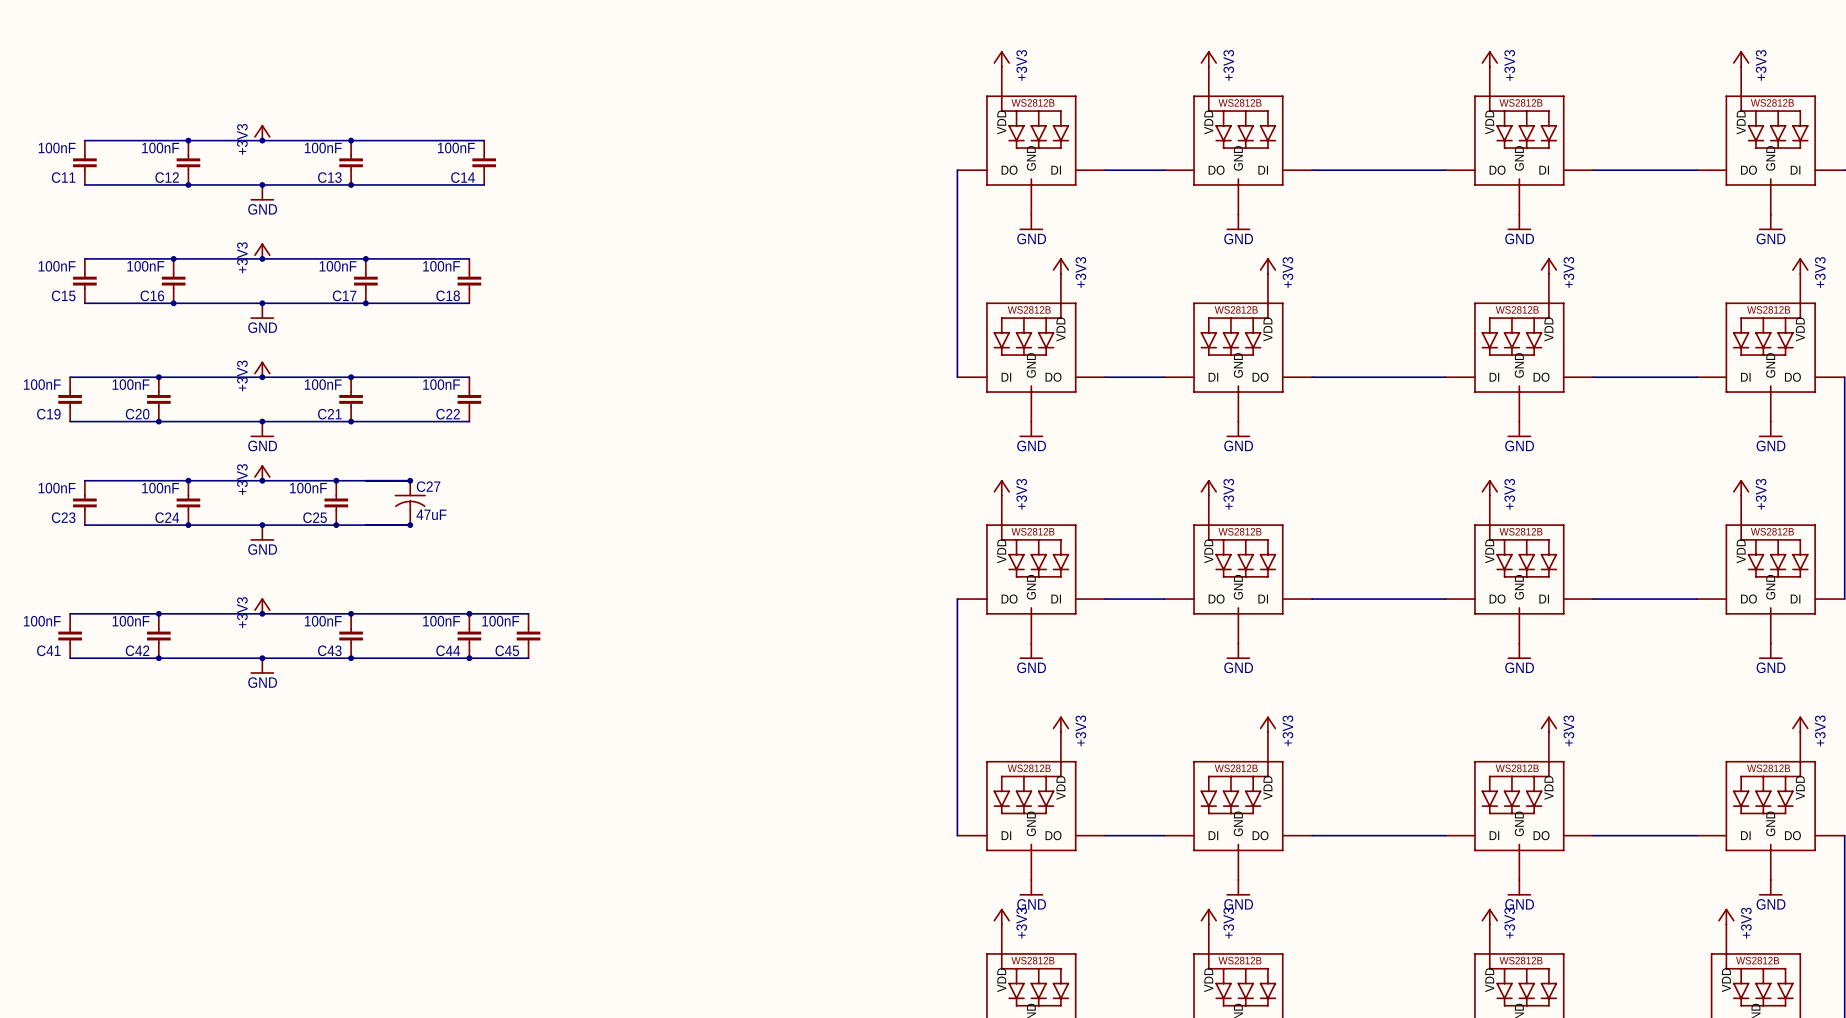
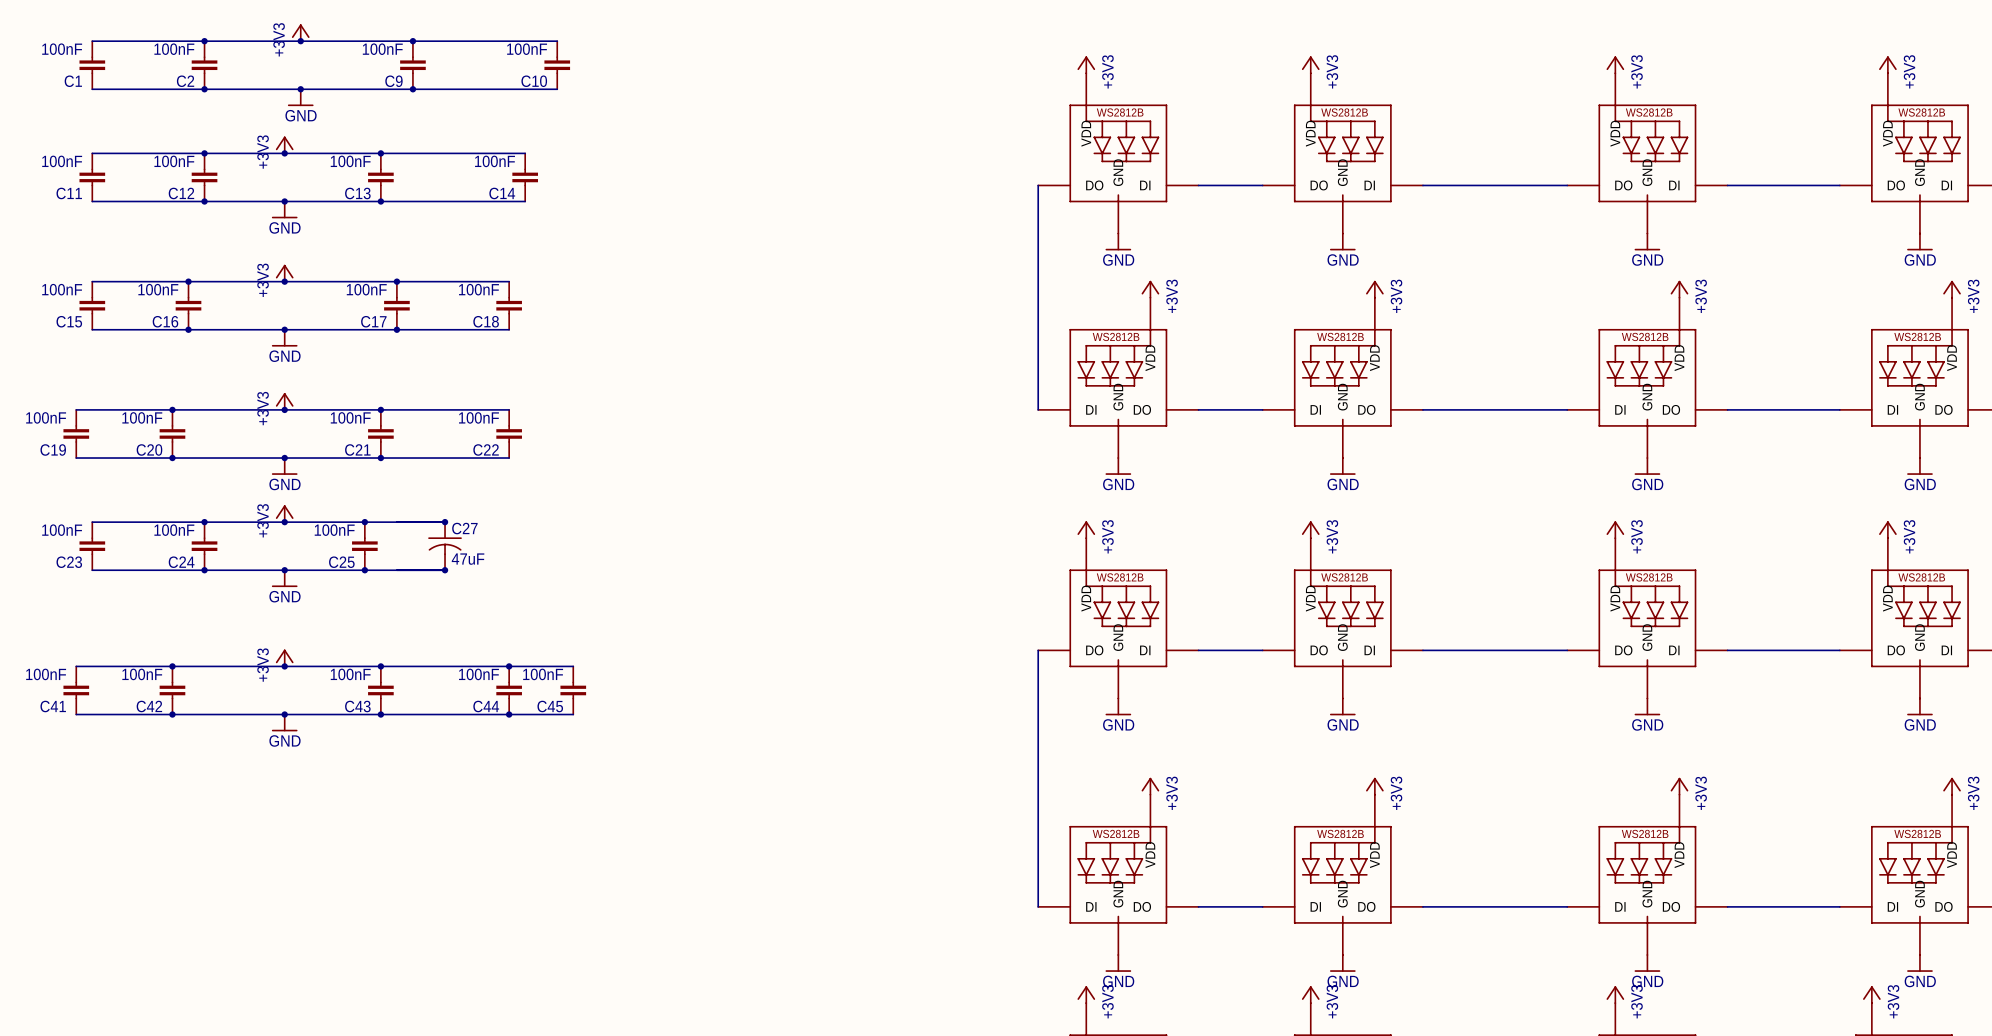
power symbol: none -> +3V3 (300, 32)
wire: none -> (92, 41) (557, 41)
junction: none -> (204, 41)
junction: none -> (300, 41)
junction: none -> (412, 41)
C1: none -> 100nF (92, 65)
C2: none -> 100nF (204, 65)
C9: none -> 100nF (412, 65)
C10: none -> 100nF (557, 65)
wire: none -> (92, 89) (557, 89)
junction: none -> (204, 89)
junction: none -> (300, 89)
junction: none -> (412, 89)
power symbol: none -> GND (300, 97)

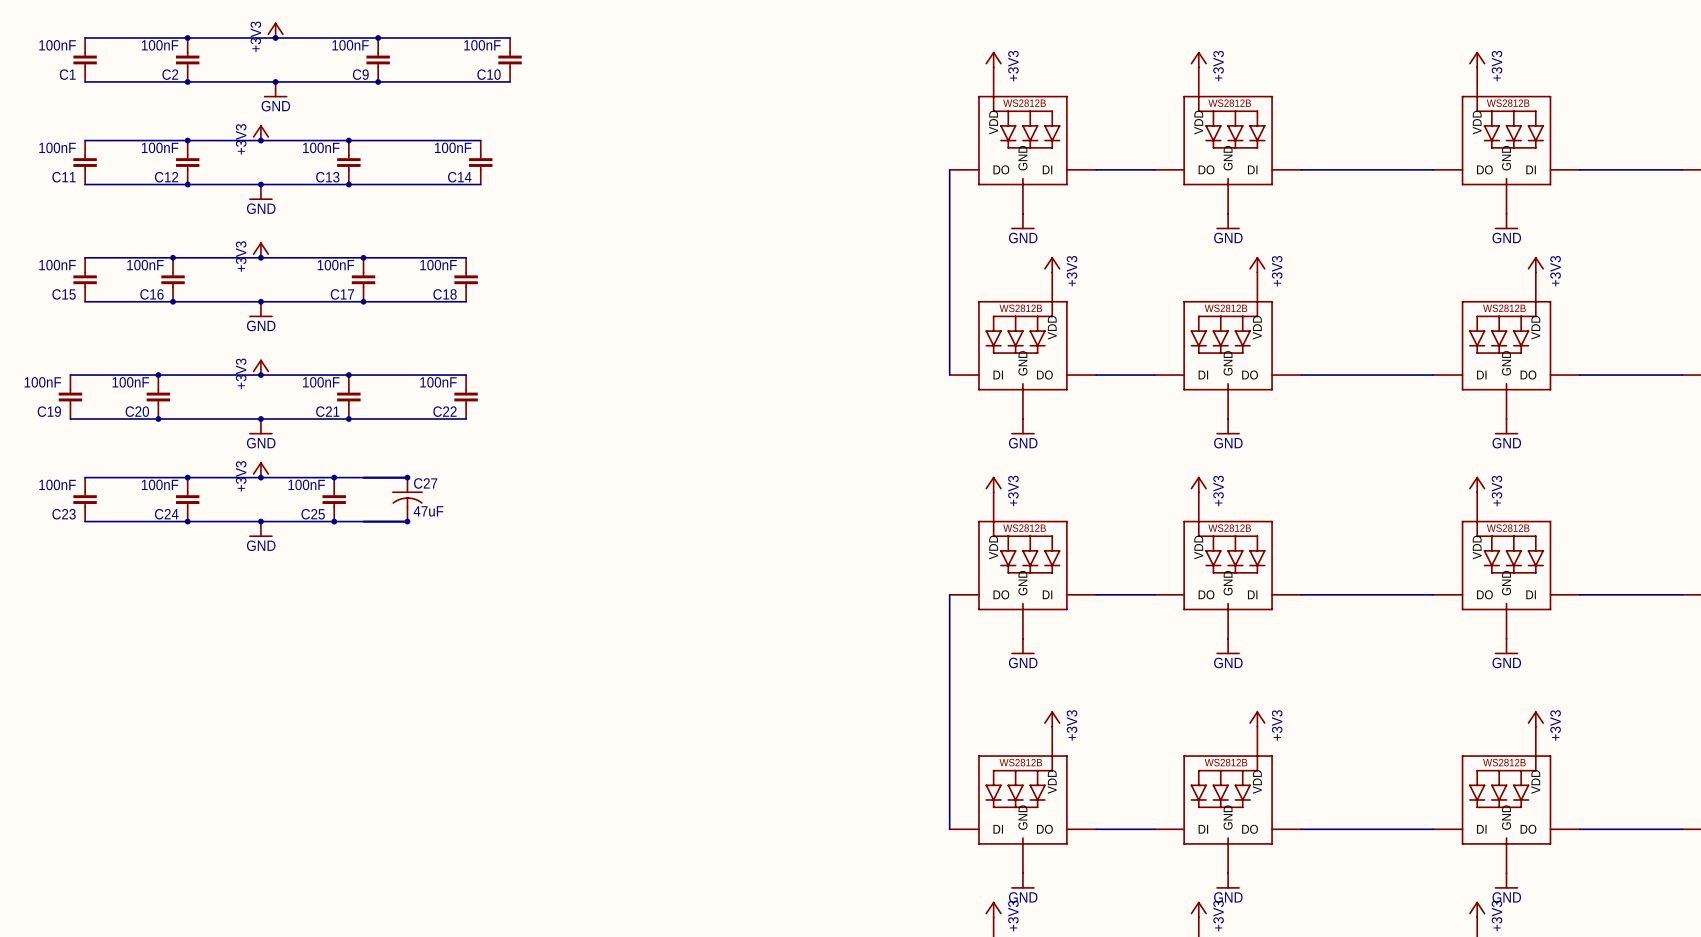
power symbol: +3V3 (284, 658) -> none
wire: (76, 666) (573, 666) -> none
junction: (172, 666) -> none
junction: (284, 666) -> none
junction: (380, 666) -> none
junction: (509, 666) -> none
C41: 100nF (76, 690) -> none
C42: 100nF (172, 690) -> none
C43: 100nF (380, 690) -> none
C44: 100nF (509, 690) -> none
C45: 100nF (573, 690) -> none
wire: (76, 714) (573, 714) -> none
junction: (172, 714) -> none
junction: (284, 714) -> none
junction: (380, 714) -> none
junction: (509, 714) -> none
power symbol: GND (284, 722) -> none

